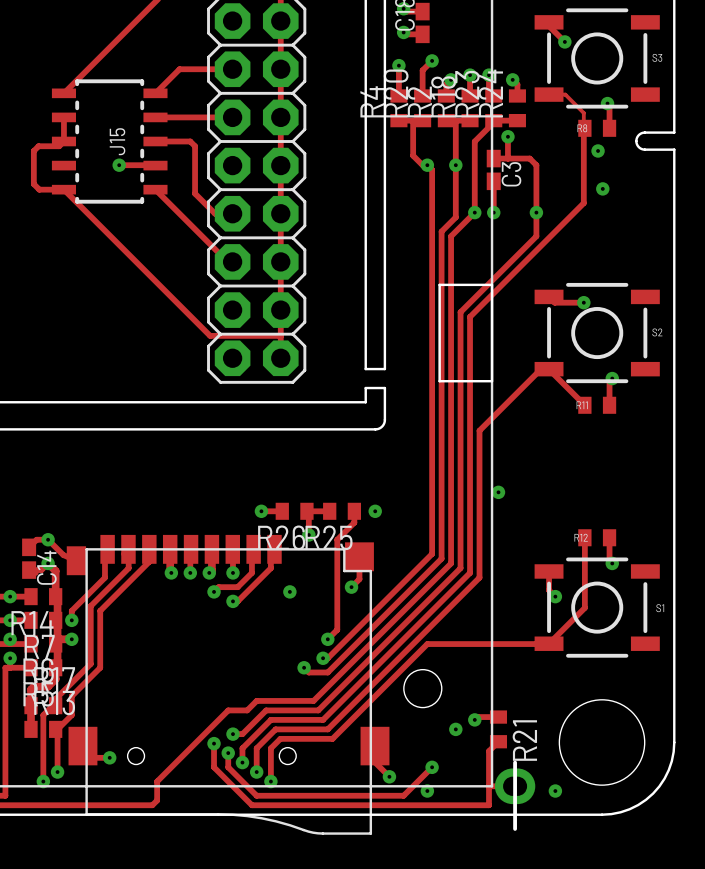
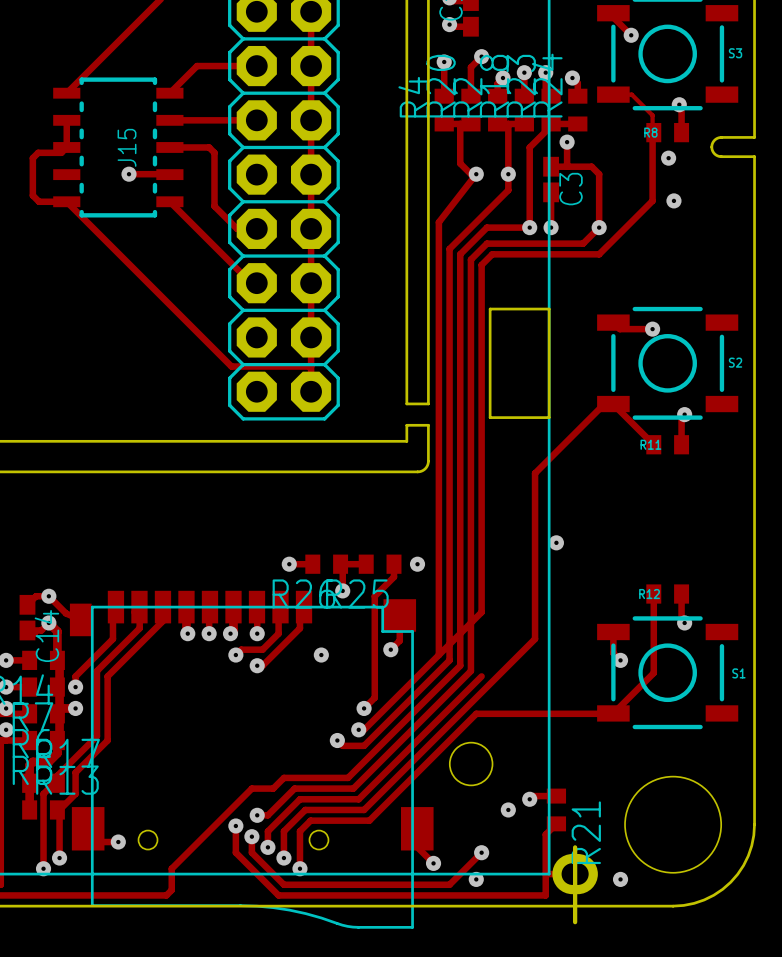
track: (427, 165) (432, 169) (432, 245) -> (652, 200) (599, 254) (492, 254) (481, 265)
track: none -> (476, 174) (438, 222) (438, 655)
track: (455, 179) (455, 217) (441, 231) (441, 558) (403, 596) -> (508, 190) (449, 248) (449, 660)
track: (583, 188) (583, 203) (470, 316) (470, 572) (432, 610) -> none
track: (474, 212) (451, 236) (451, 563) (413, 601) -> (529, 227) (486, 227) (460, 254) (460, 665)
track: (536, 212) (536, 236) (460, 312) (460, 568) (422, 606) -> (599, 227) (583, 243) (486, 243) (470, 259) (470, 671)

